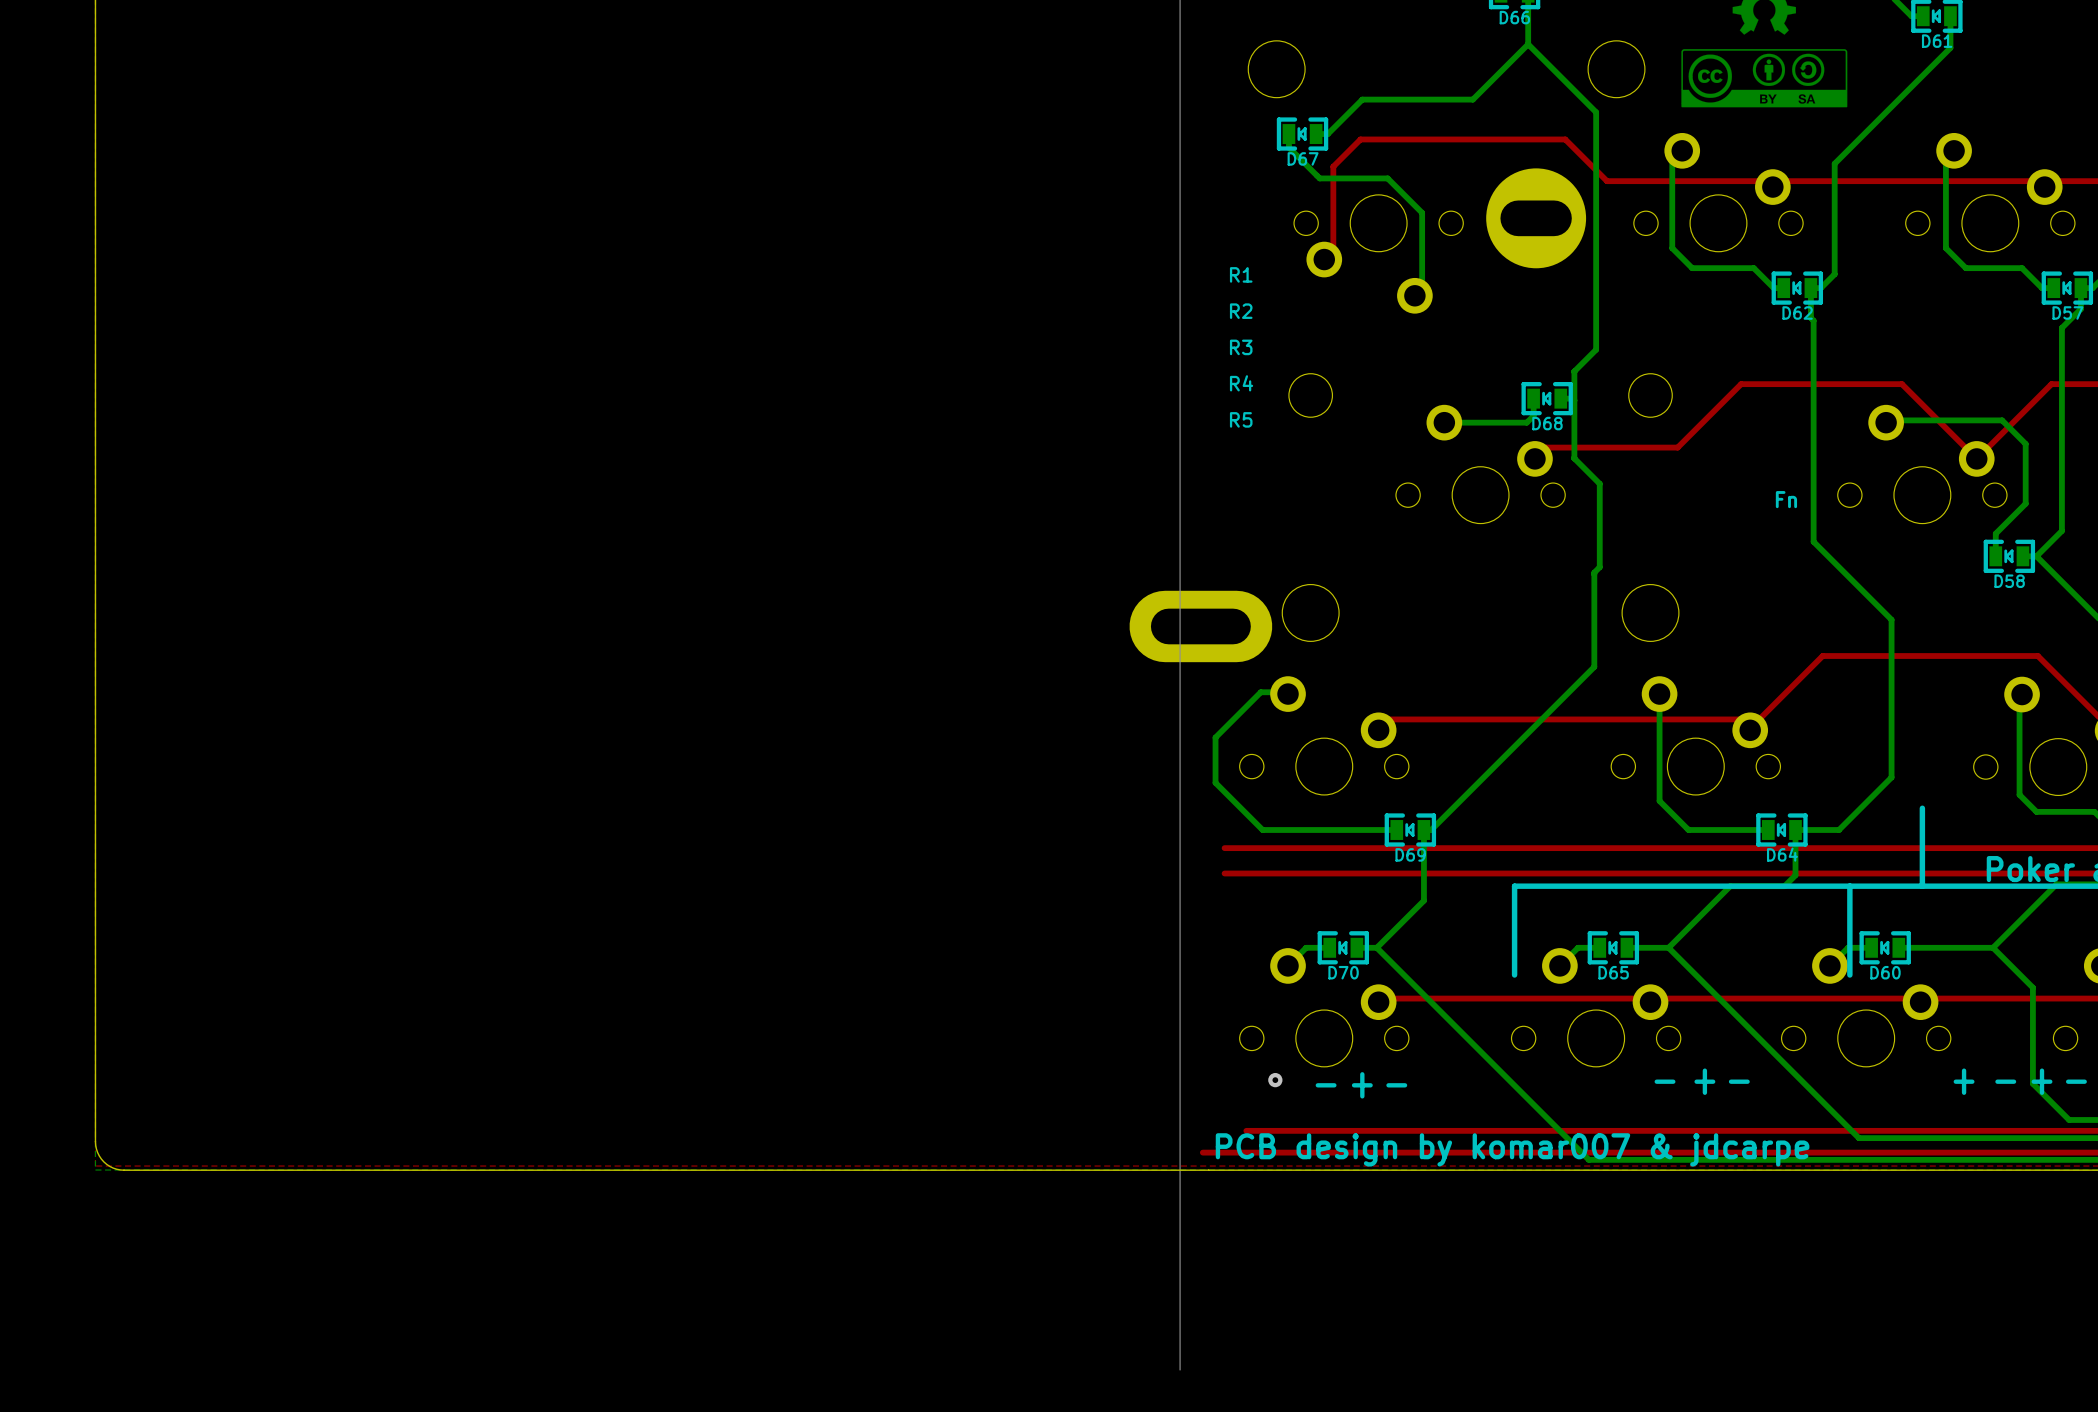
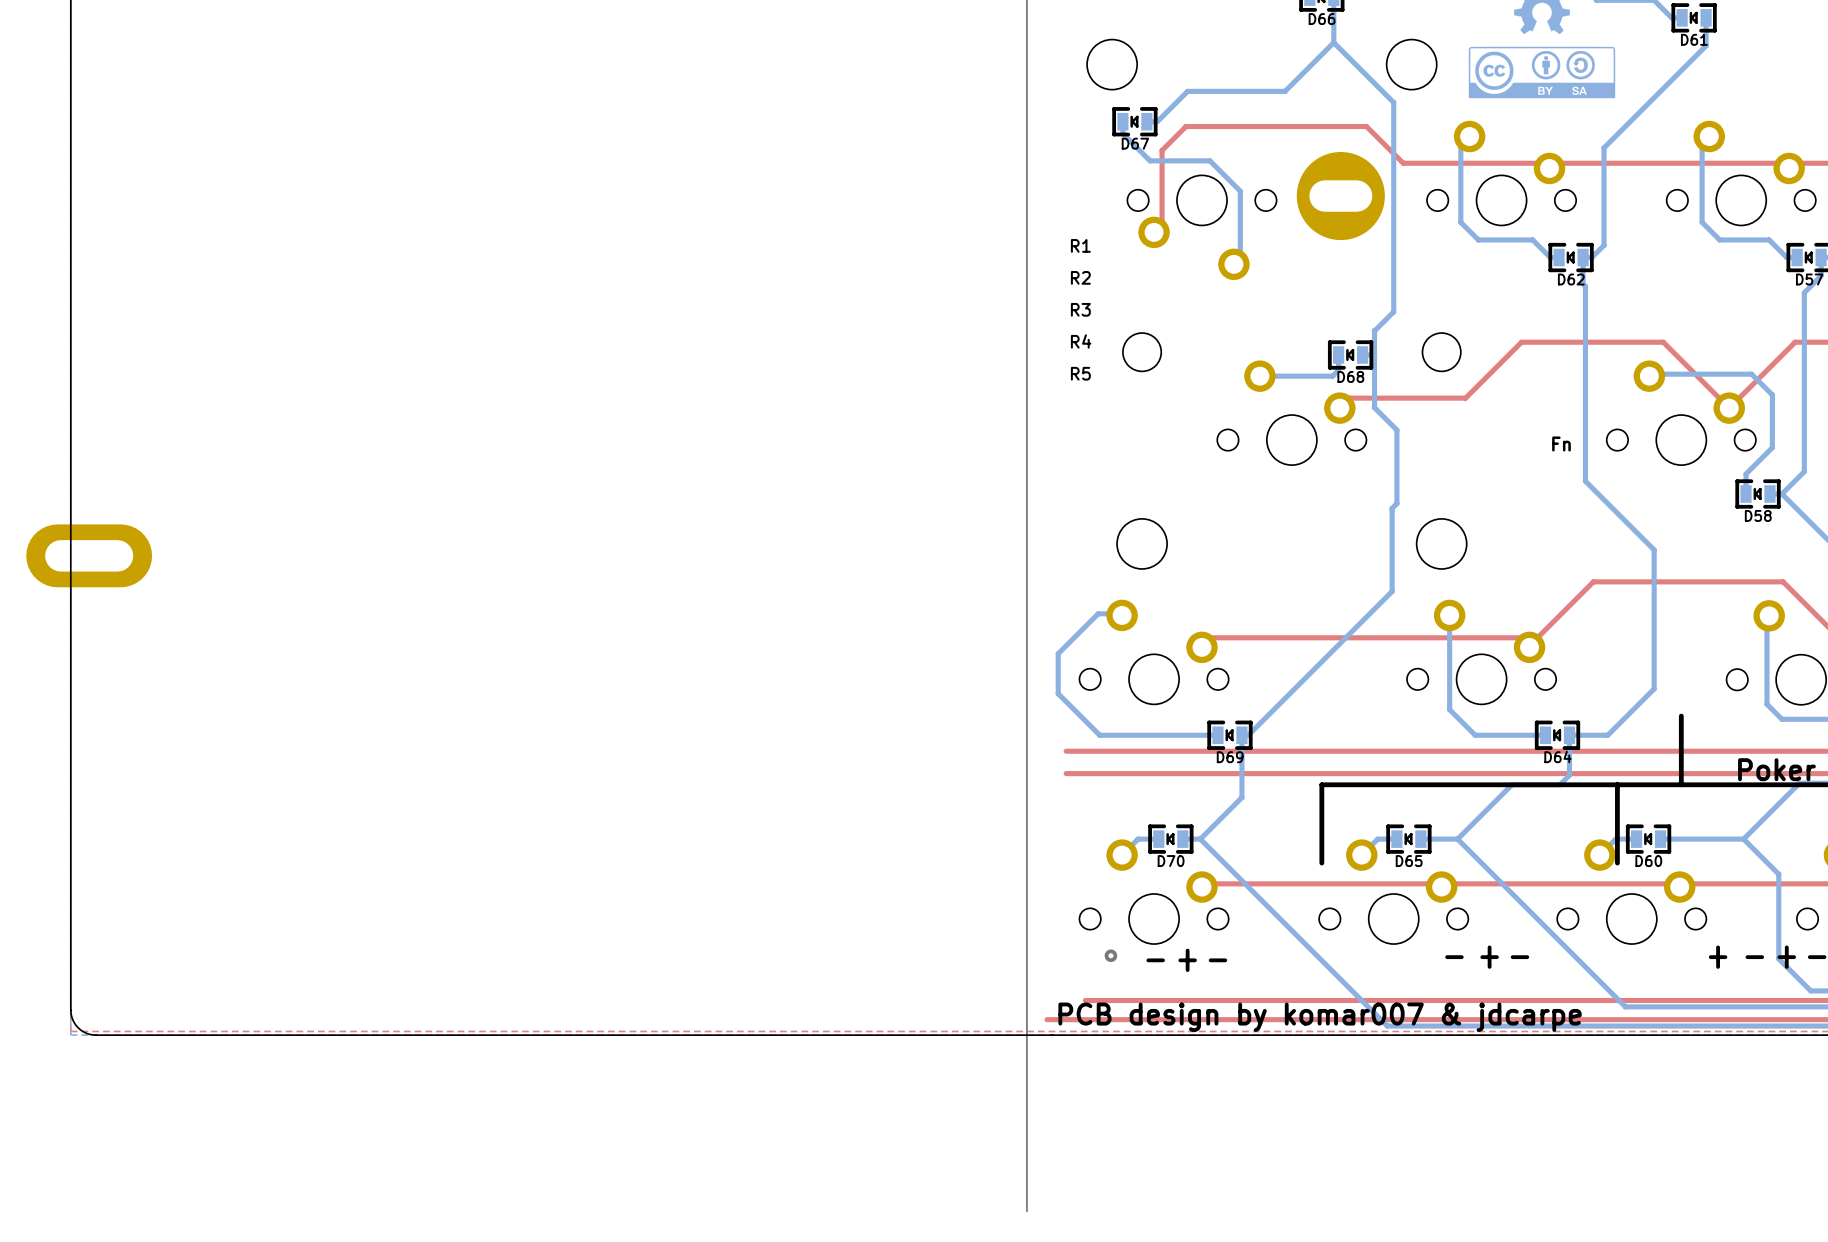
part: none -> (89, 555)
part: (1200, 626) -> none

